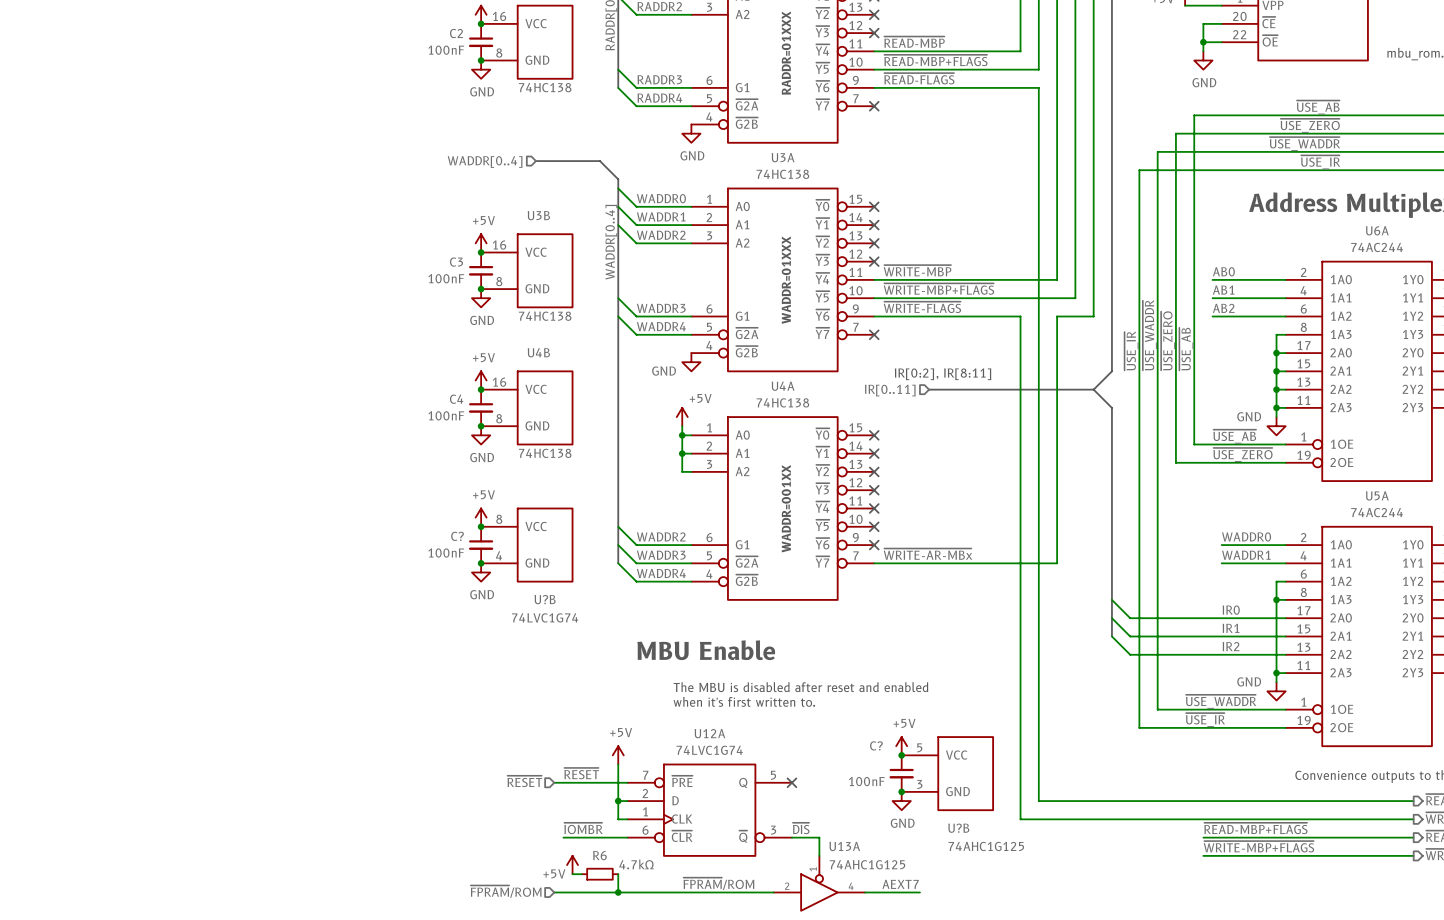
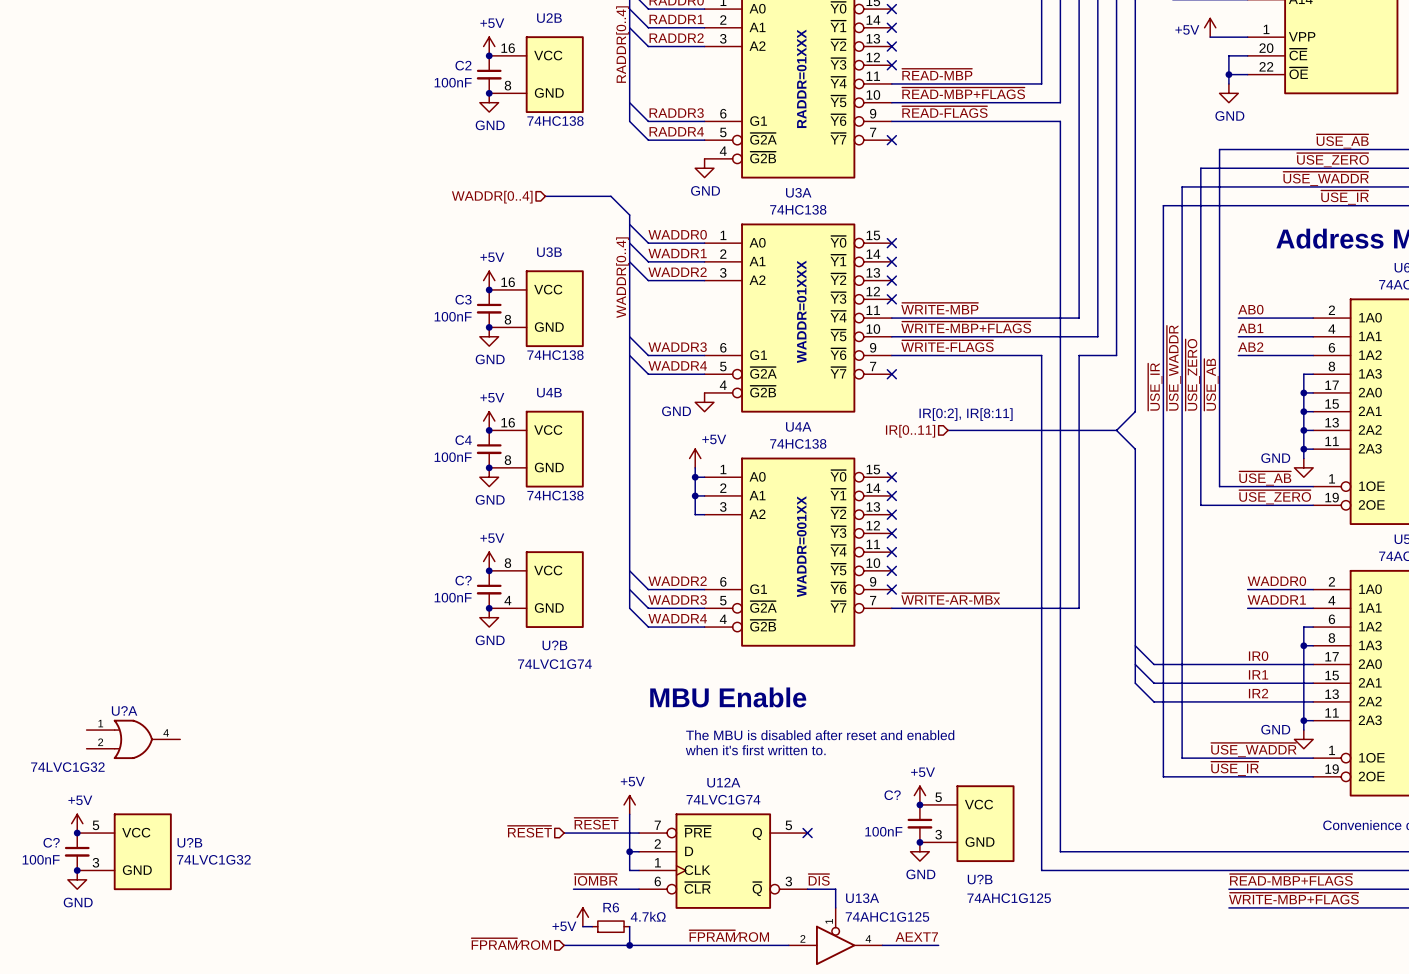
U?A: none -> 74LVC1G32 (133, 739)
power symbol: none -> +5V (77, 823)
junction: none -> (77, 833)
C?: none -> 100nF (77, 851)
U?B: none -> 74LVC1G32 (124, 851)
junction: none -> (77, 870)
power symbol: none -> GND (77, 879)

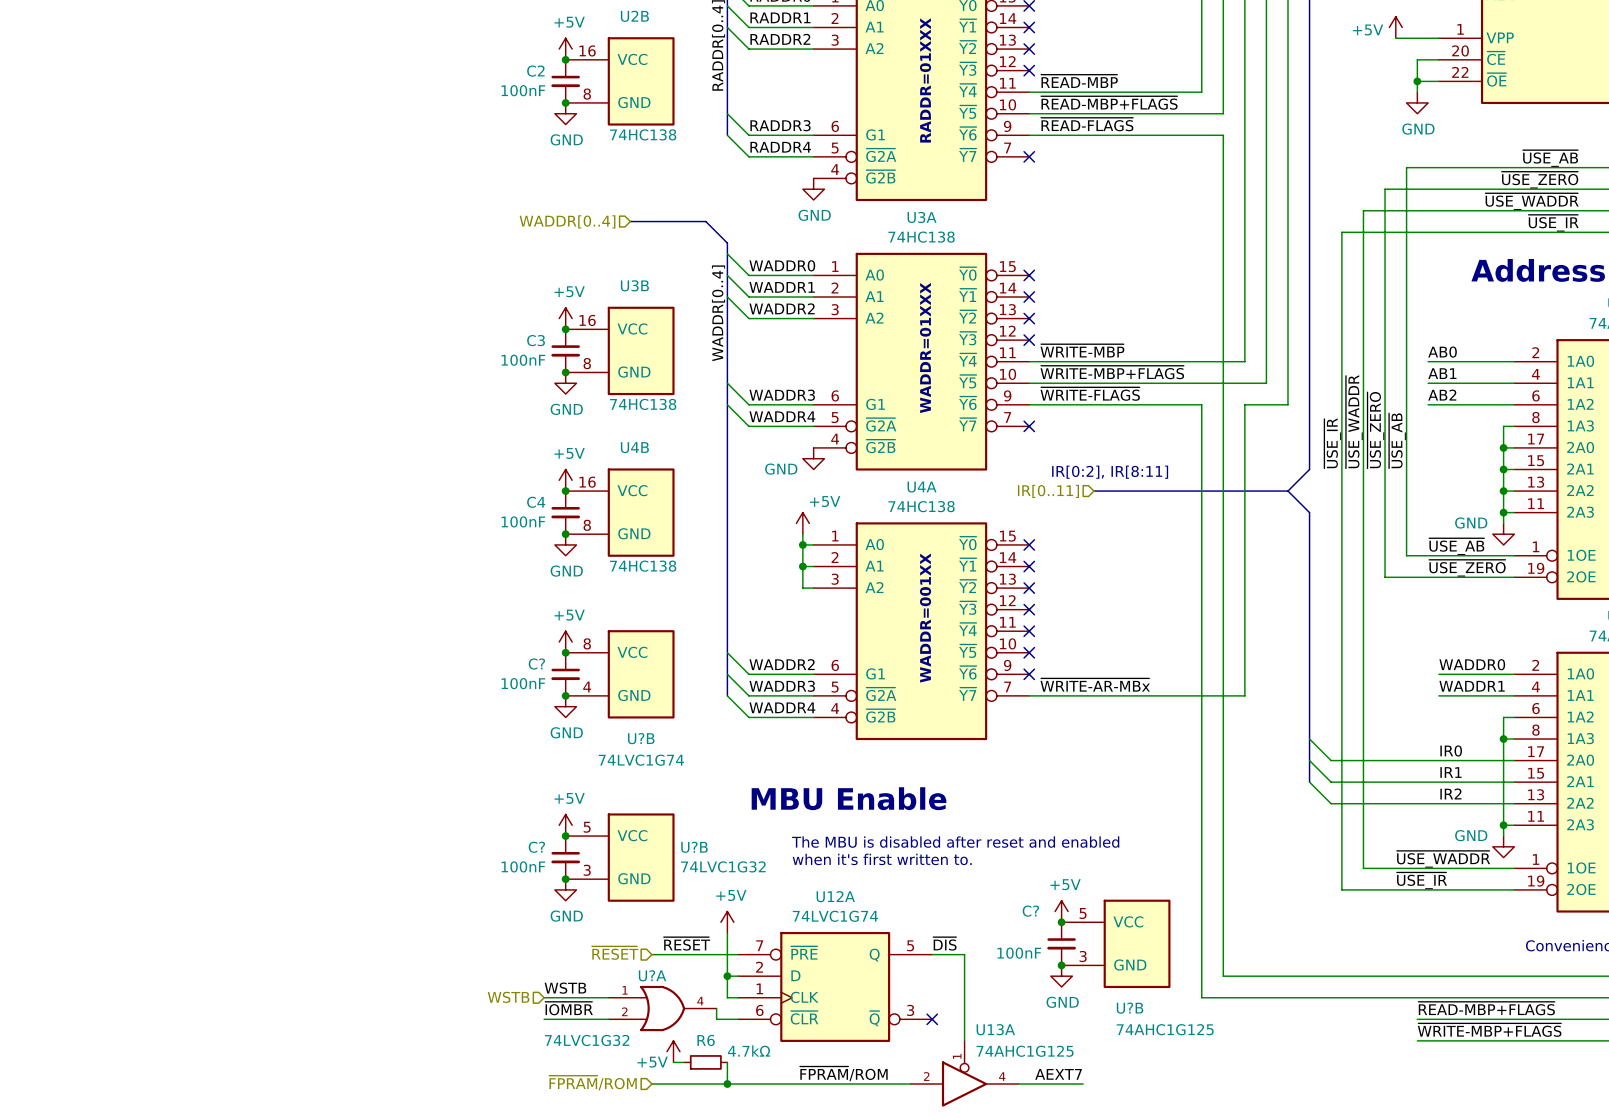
power symbol: none -> +5V (565, 825)
junction: none -> (565, 836)
U?A: 74LVC1G32 (133, 739) -> none
C?: none -> 100nF (565, 857)
U?B: none -> 74LVC1G32 (620, 857)
junction: none -> (565, 879)
power symbol: none -> GND (565, 889)
power symbol: +5V (77, 823) -> none
junction: (77, 833) -> none
no-connect mark: (807, 833) -> none
C?: 100nF (77, 851) -> none
U?B: 74LVC1G32 (124, 851) -> none
label: none -> WSTB (565, 988)
junction: (77, 870) -> none
hierarchical label: none -> WSTB (508, 997)
wire: none -> (544, 997) (608, 997)
power symbol: GND (77, 879) -> none
U?A: none -> 74LVC1G32 (662, 1008)
label position: ~{IOMBR} (595, 879) -> ~{IOMBR} (569, 1008)
label position: ~{DIS} (819, 879) -> ~{DIS} (944, 943)
wire: none -> (544, 1019) (608, 1019)
wire: (573, 889) (620, 889) -> (716, 1008) (716, 1019)
wire: (807, 889) (835, 889) -> (932, 954) (964, 954) (964, 1019)
no-connect mark: none -> (932, 1019)

